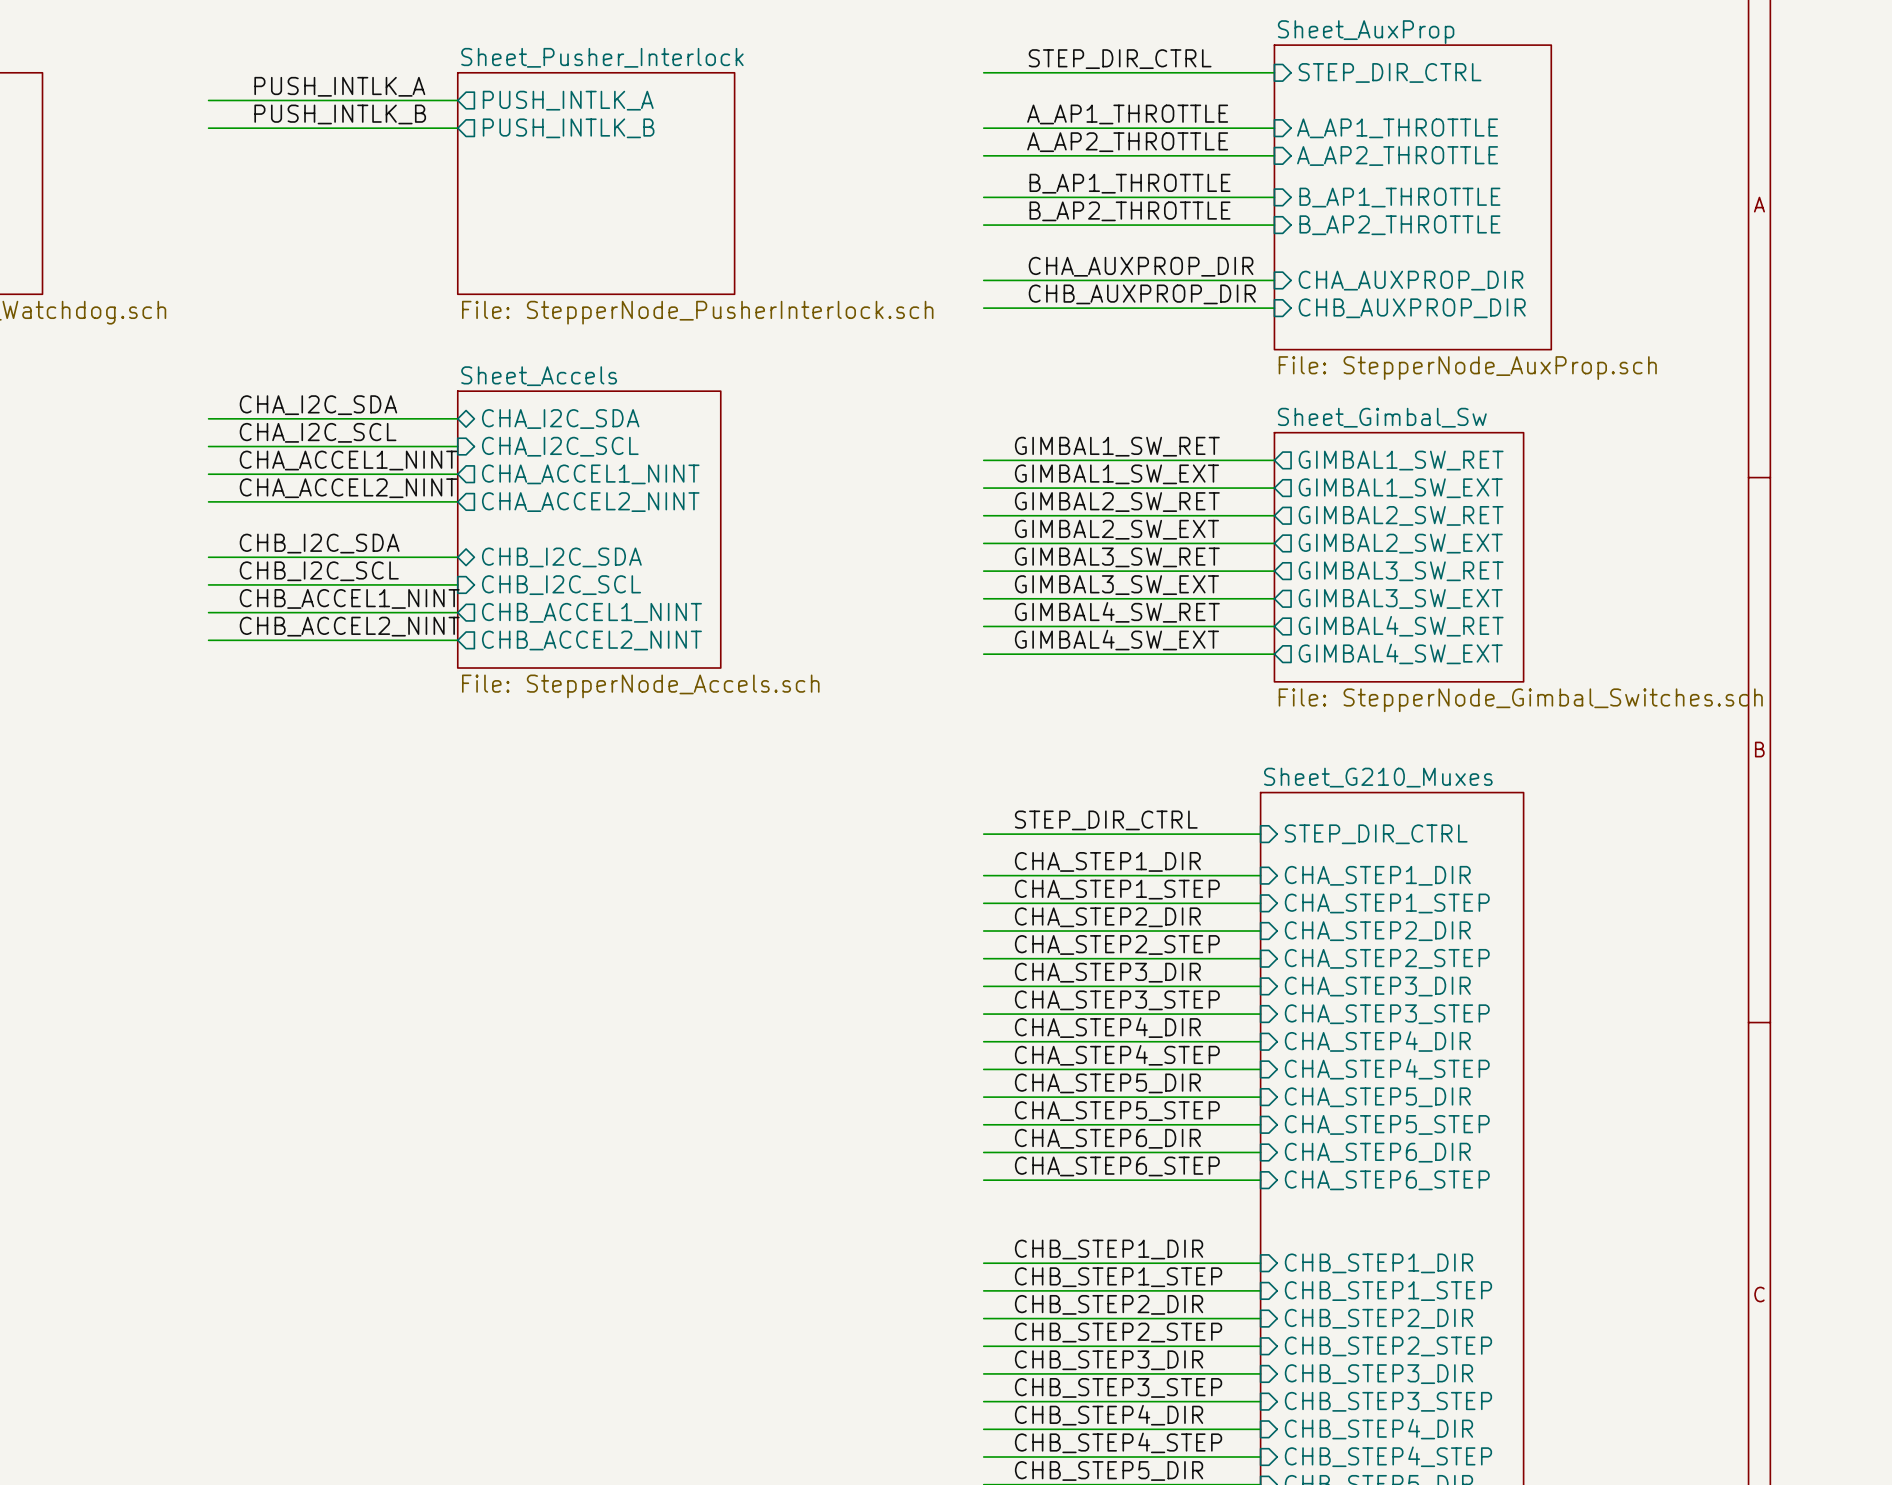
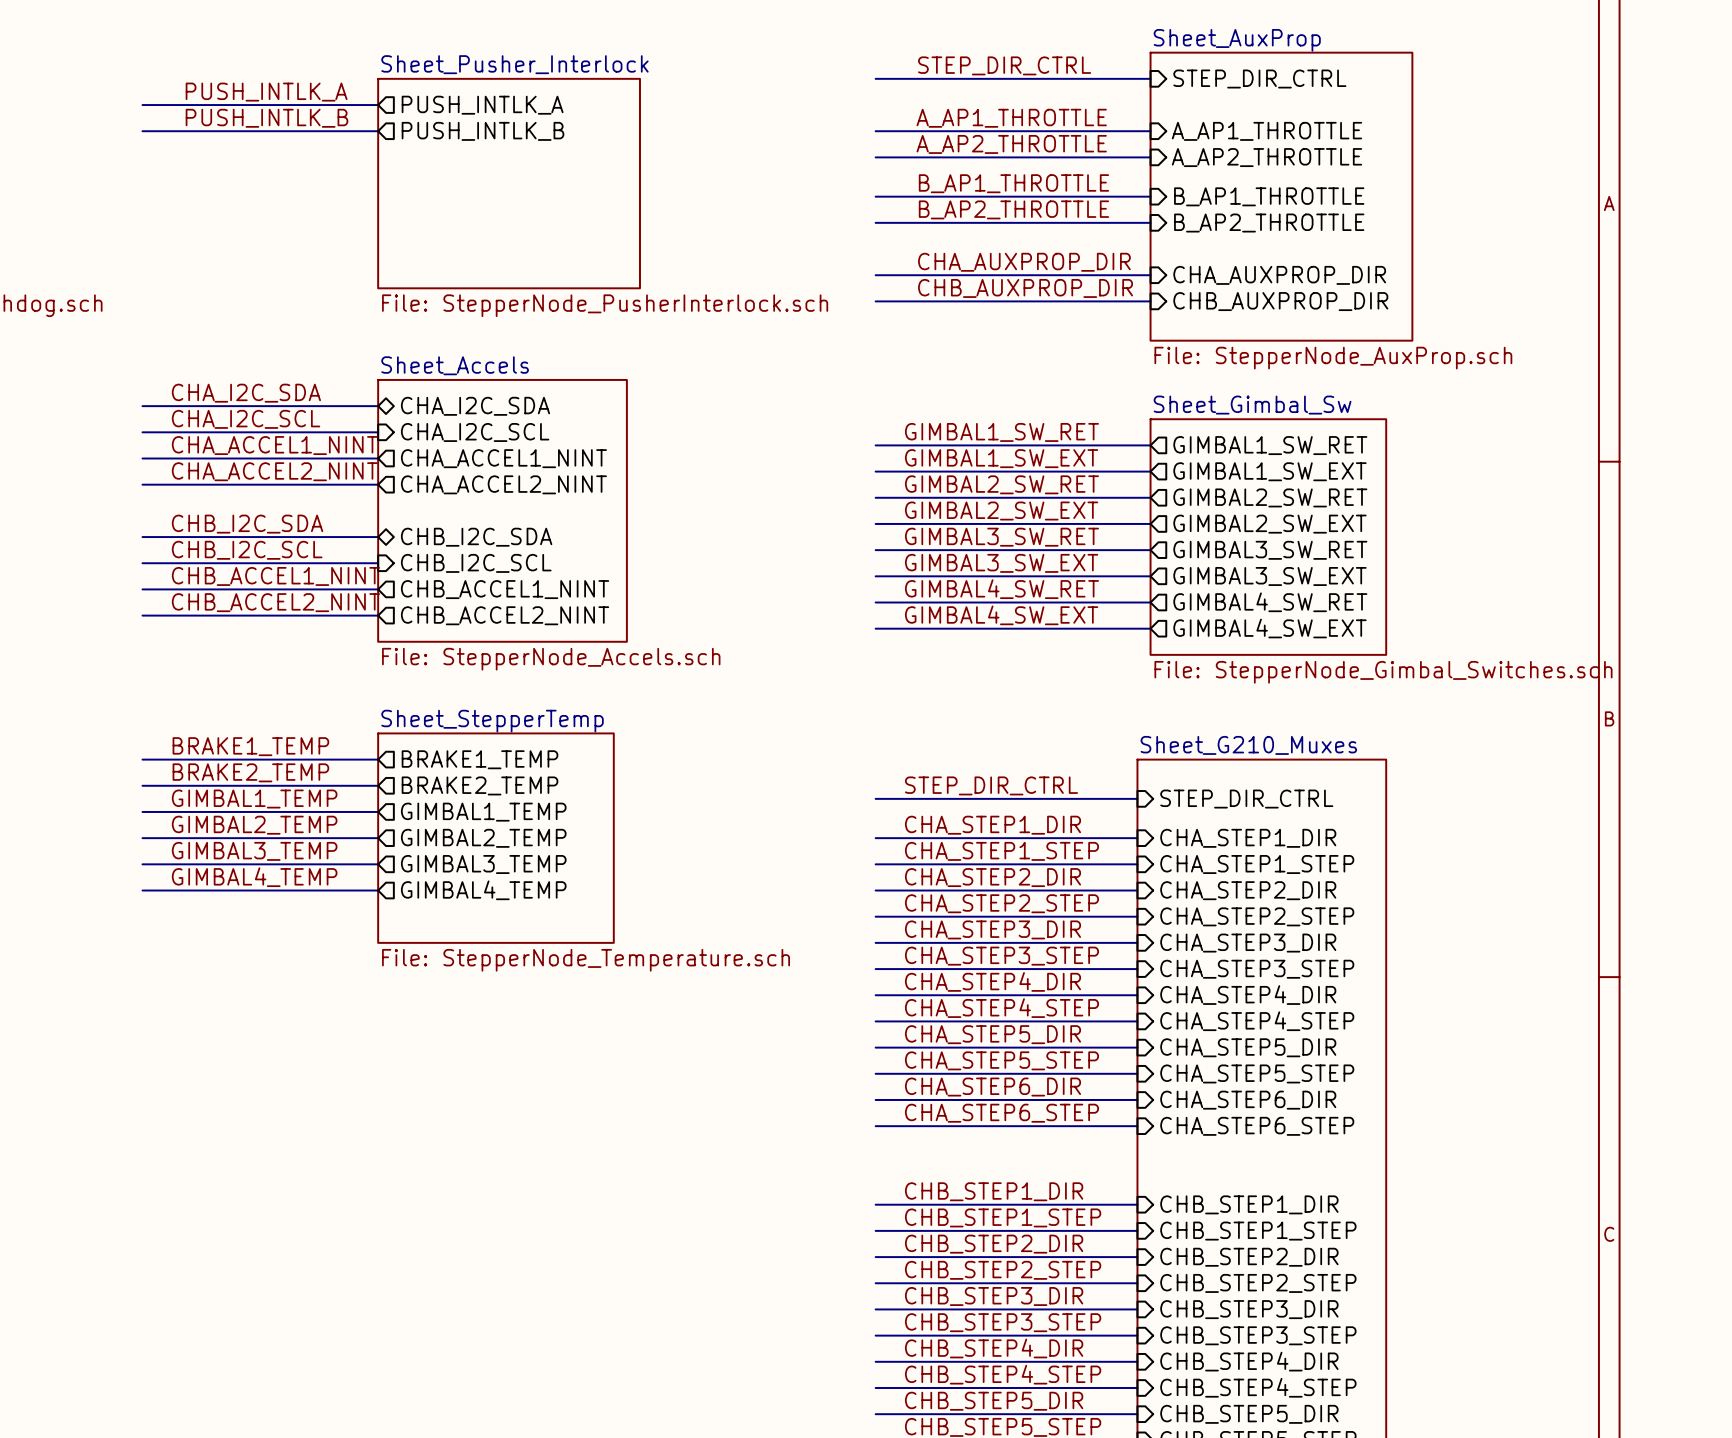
label: none -> BRAKE1_TEMP (250, 746)
wire: none -> (142, 759) (378, 759)
sheet pin: none -> BRAKE1_TEMP (479, 759)
label: none -> BRAKE2_TEMP (250, 772)
wire: none -> (142, 785) (378, 785)
sheet pin: none -> BRAKE2_TEMP (479, 785)
label: none -> GIMBAL1_TEMP (254, 799)
wire: none -> (142, 811) (378, 811)
sheet pin: none -> GIMBAL1_TEMP (483, 812)
label: none -> GIMBAL2_TEMP (254, 825)
wire: none -> (142, 838) (378, 838)
sheet pin: none -> GIMBAL2_TEMP (483, 838)
sheet Sheet_StepperTemp: none -> File: StepperNode_Temperature.sch (495, 838)
label: none -> GIMBAL3_TEMP (254, 851)
wire: none -> (142, 864) (378, 864)
sheet pin: none -> GIMBAL3_TEMP (483, 864)
label: none -> GIMBAL4_TEMP (254, 877)
sheet pin: none -> GIMBAL4_TEMP (483, 890)
wire: none -> (142, 890) (378, 890)

